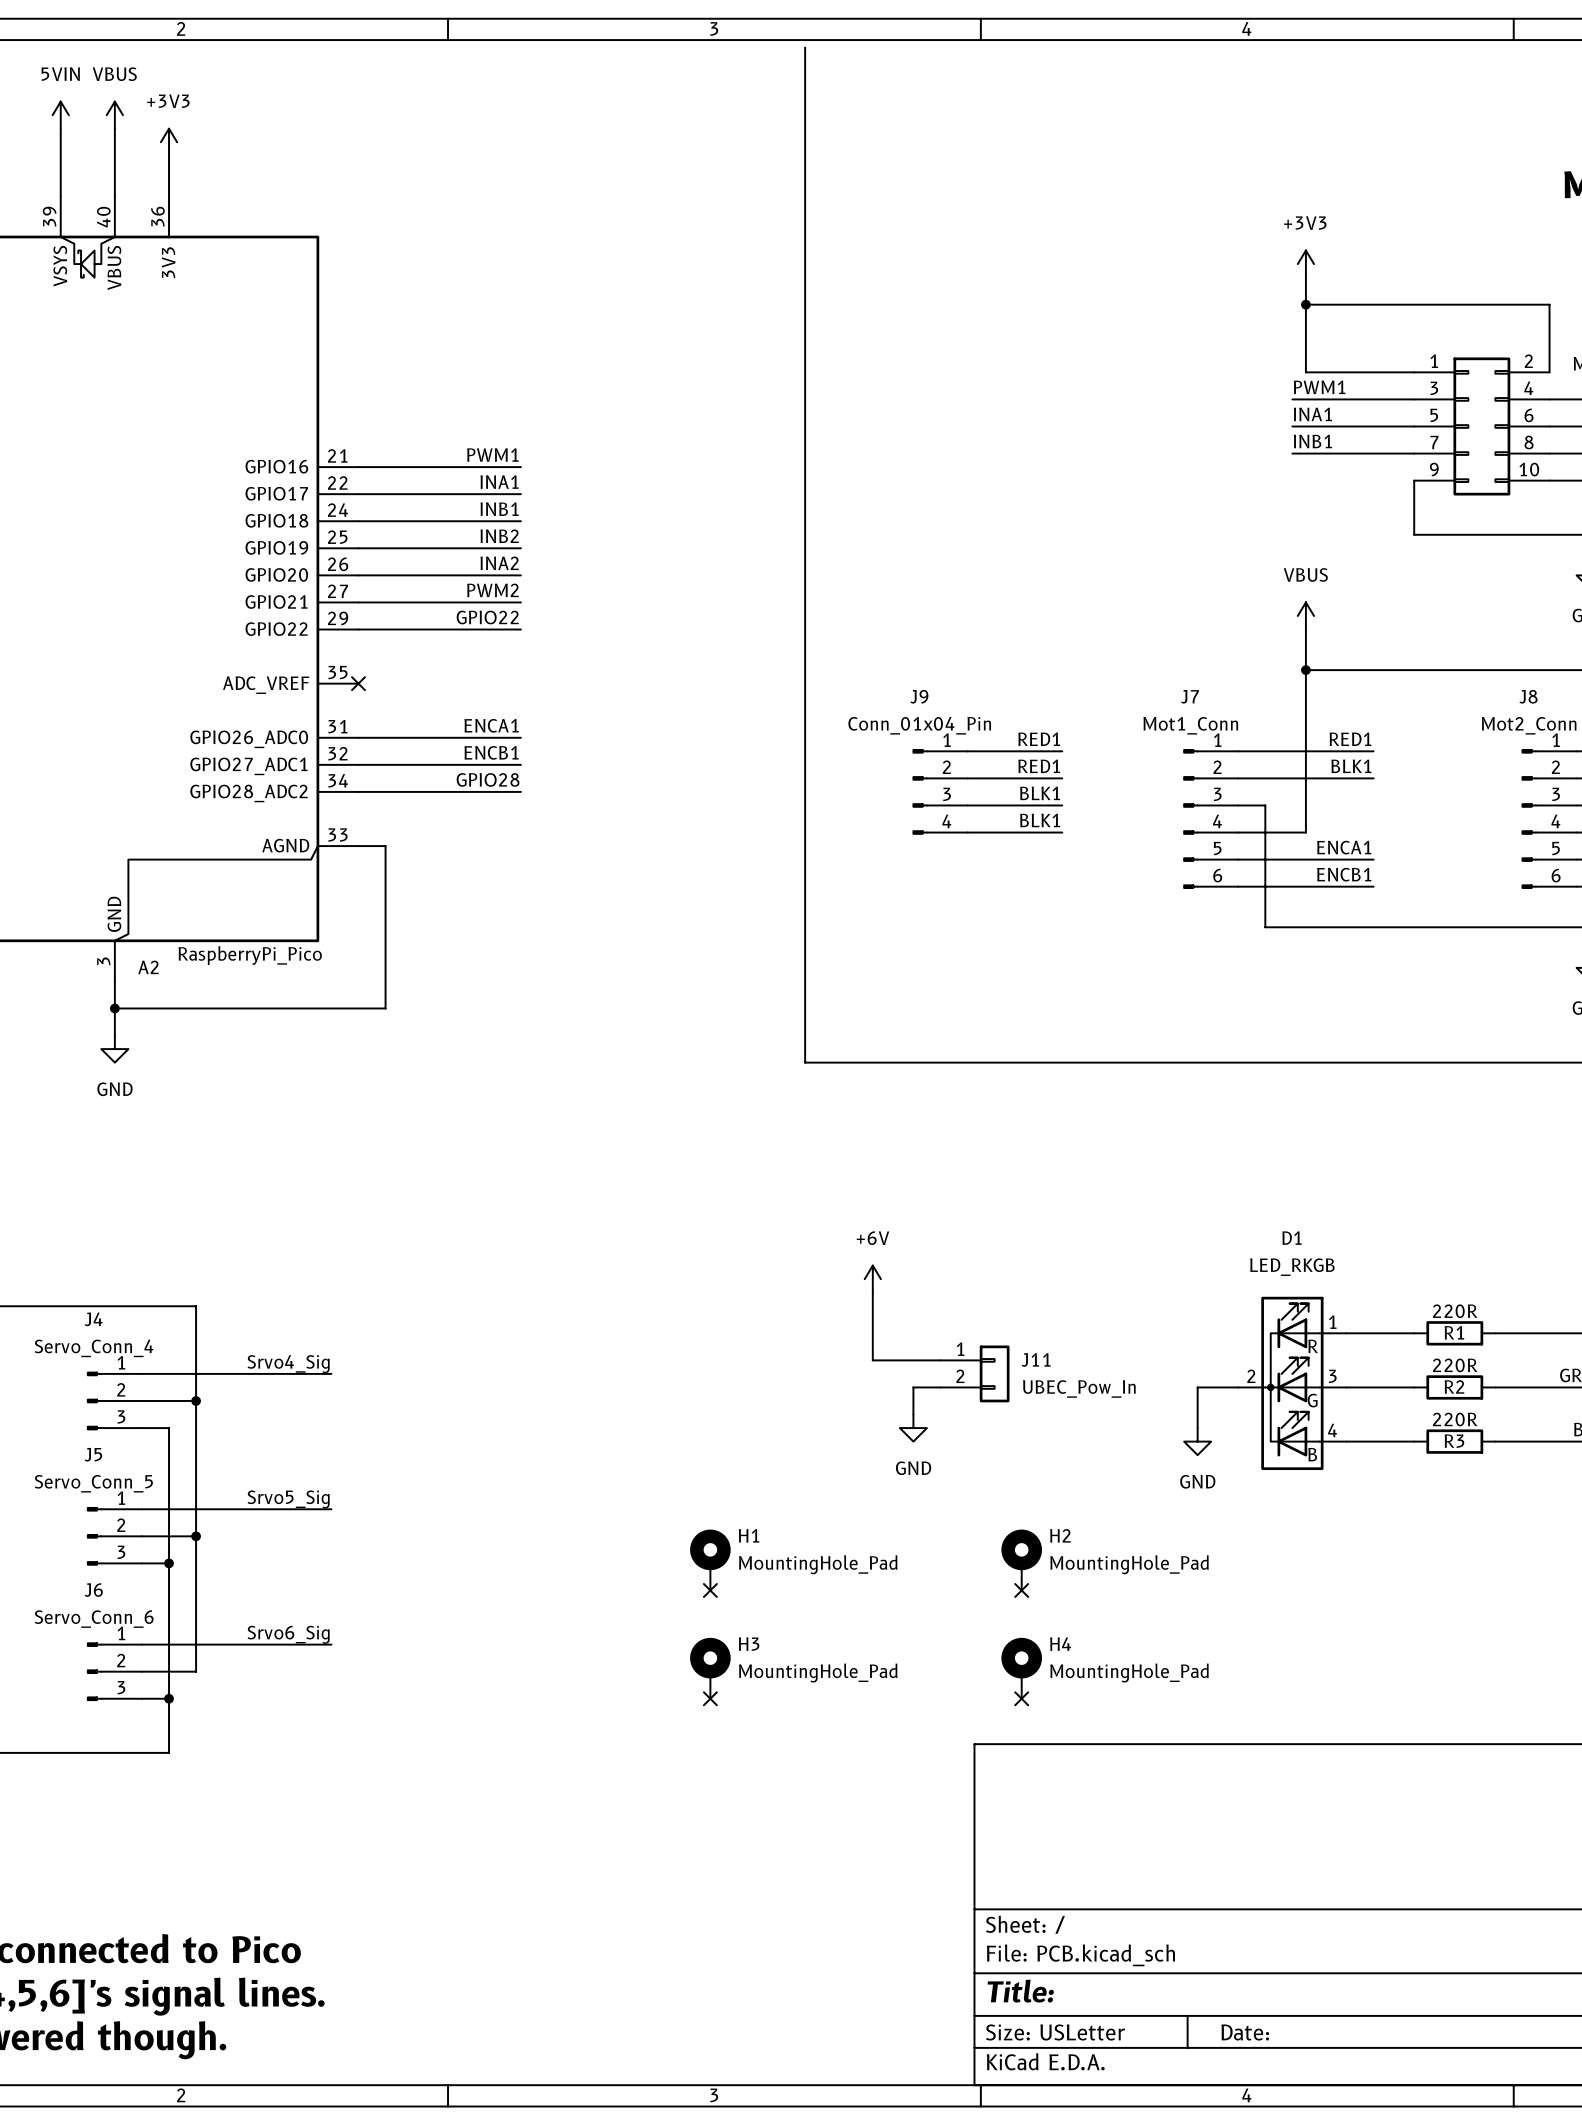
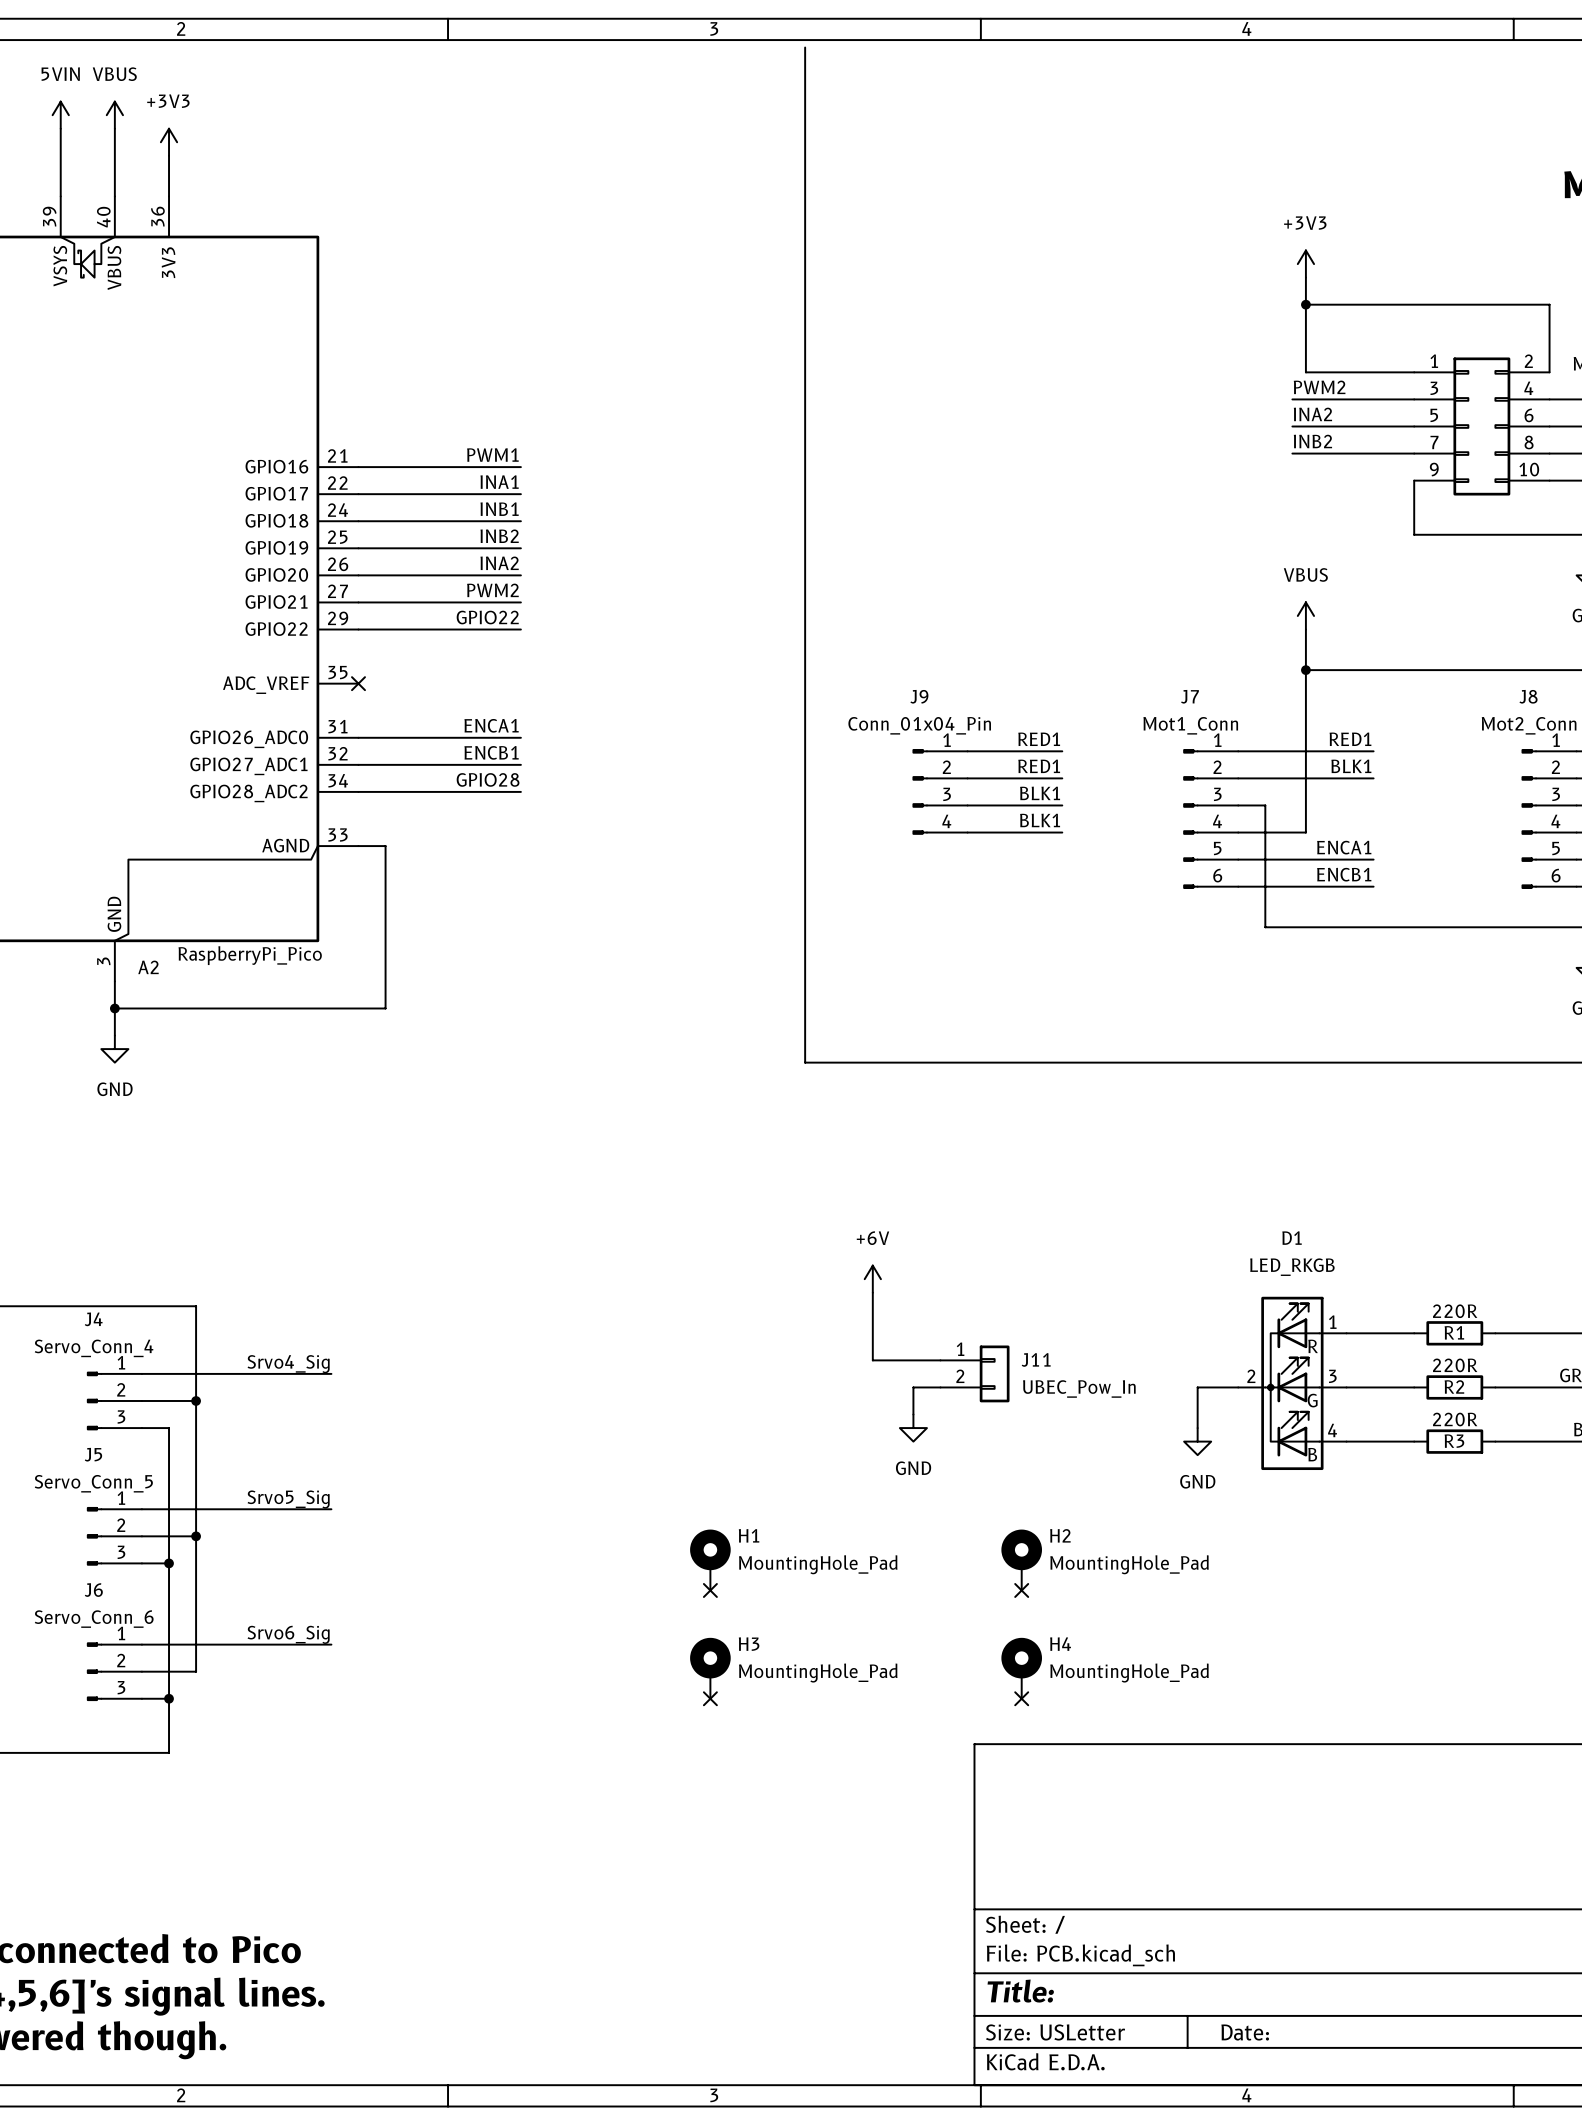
label: PWM1 (1319, 387) -> PWM2 (1319, 387)
label: INA1 (1312, 414) -> INA2 (1312, 414)
label: INB1 (1312, 441) -> INB2 (1312, 441)

